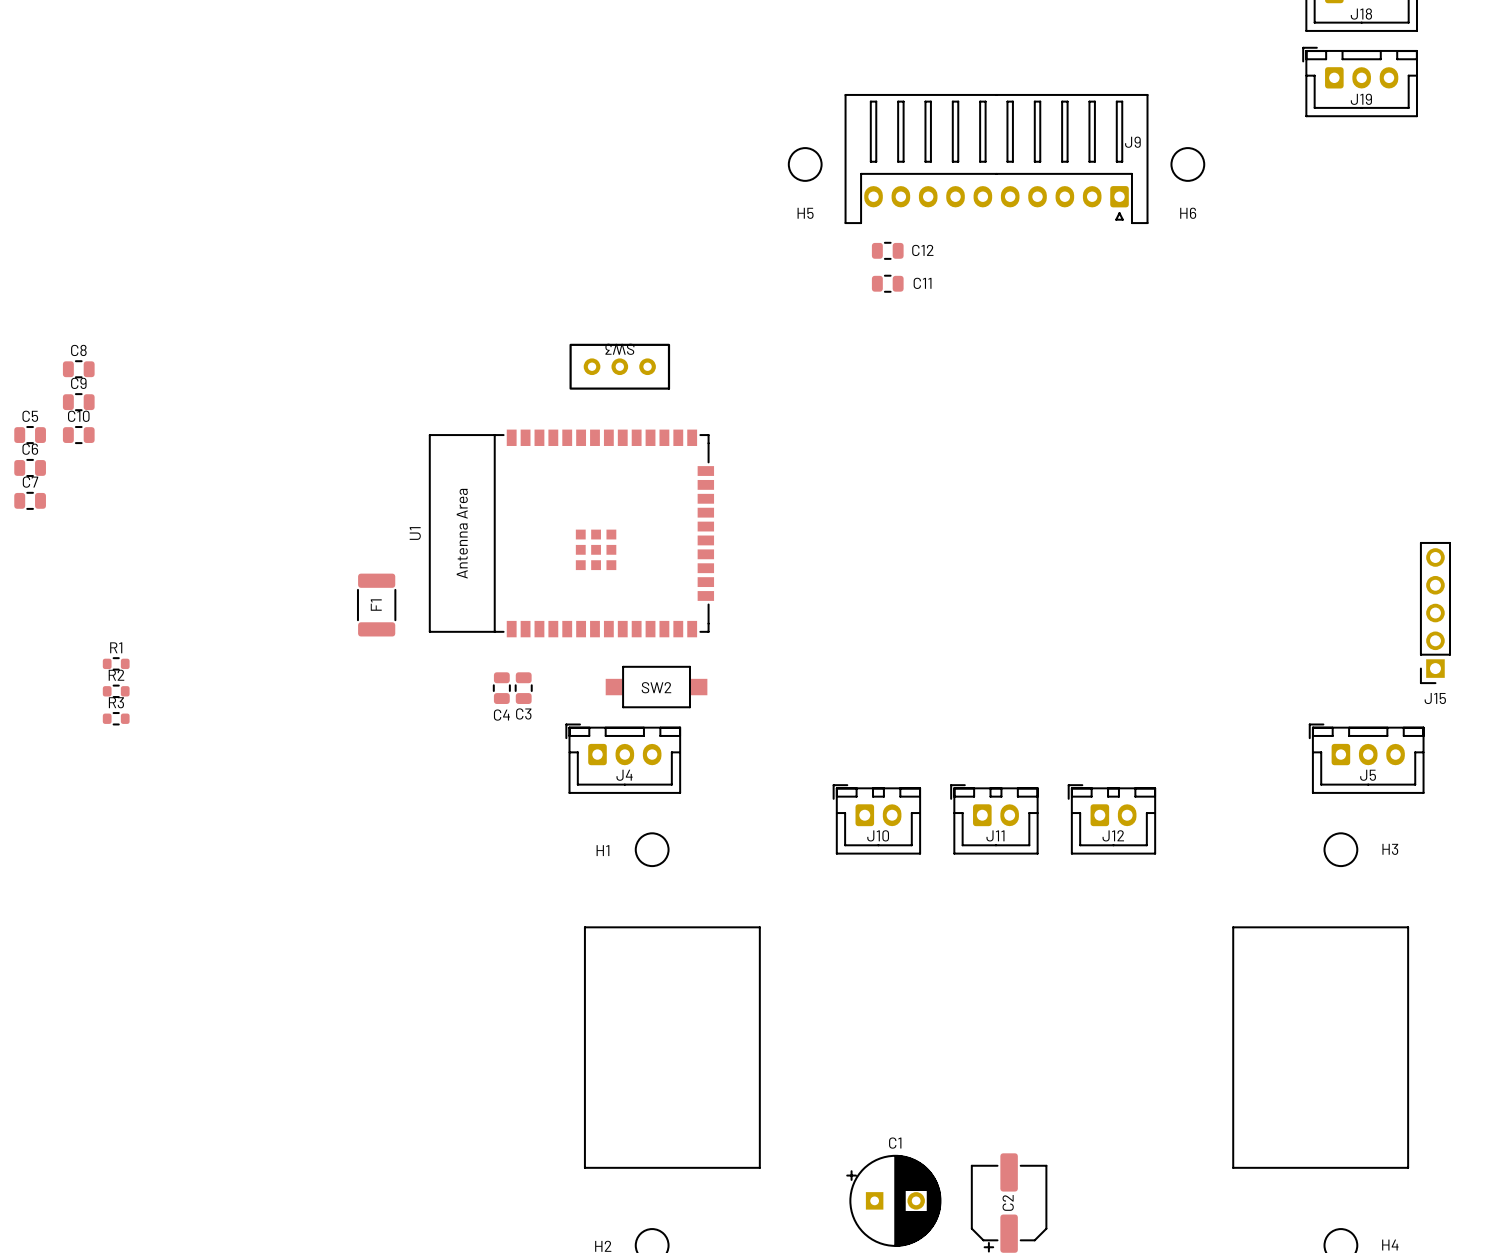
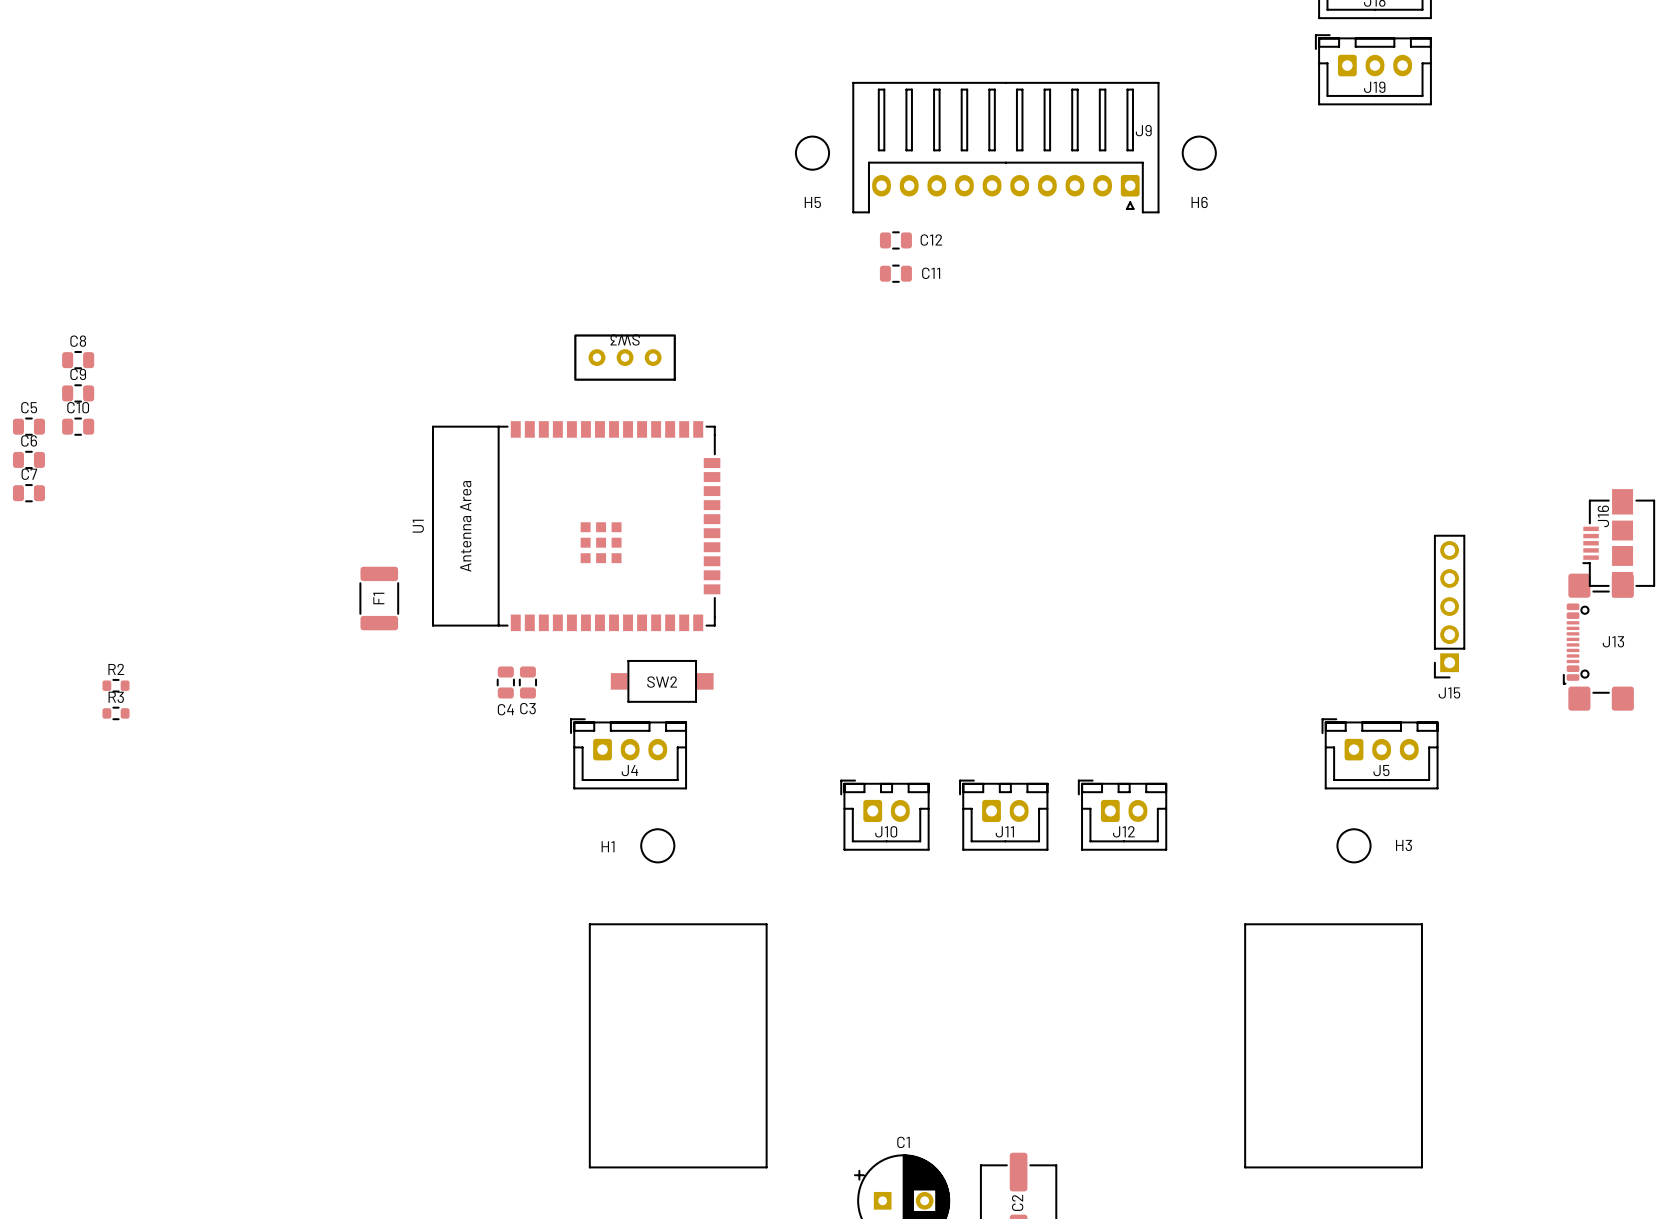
R1: (116, 663) -> none

